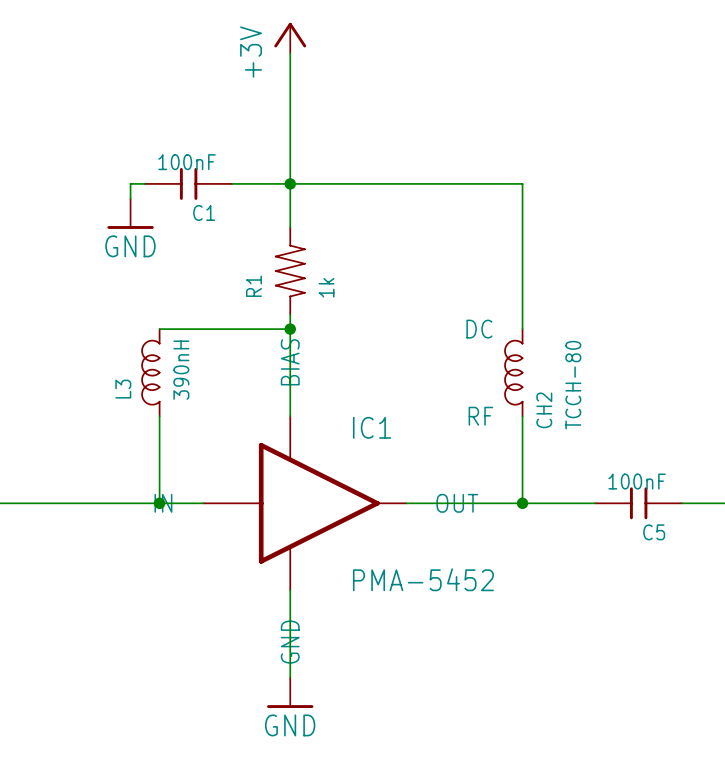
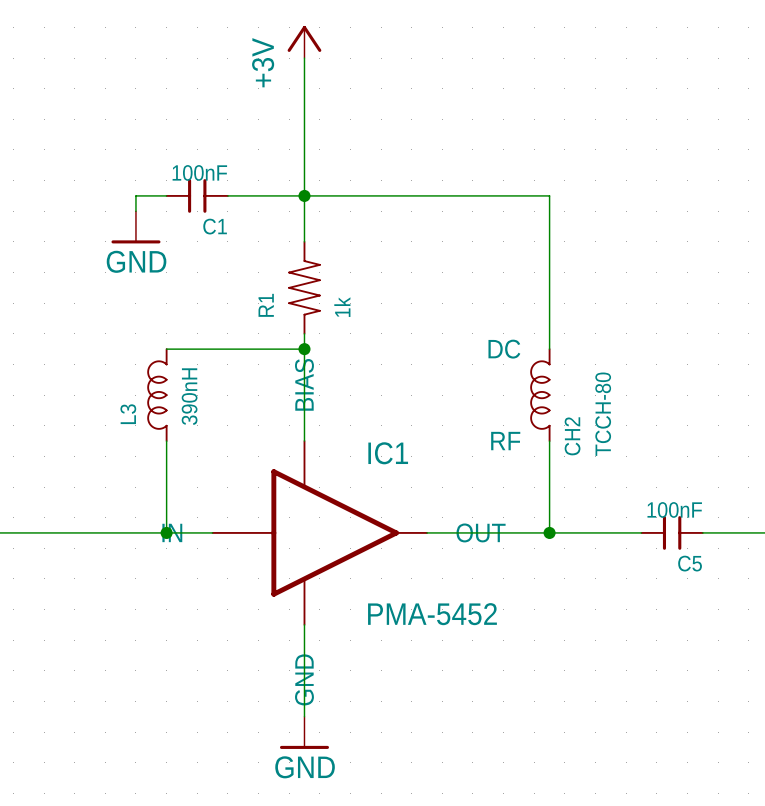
C1 symbol: [144, 167, 234, 200] -> [165, 179, 229, 213]
C5 symbol: [594, 487, 684, 520] -> [640, 516, 704, 550]

